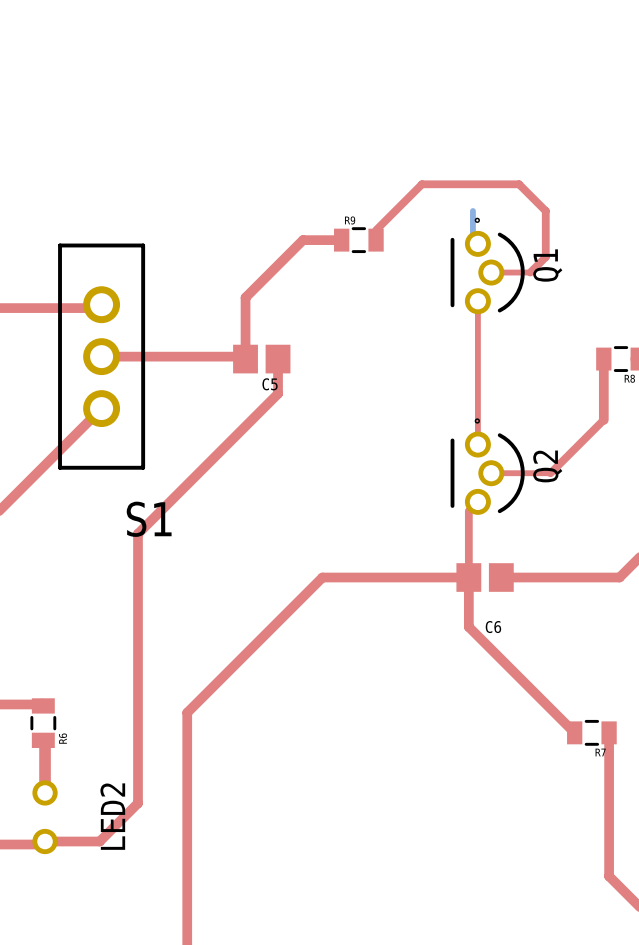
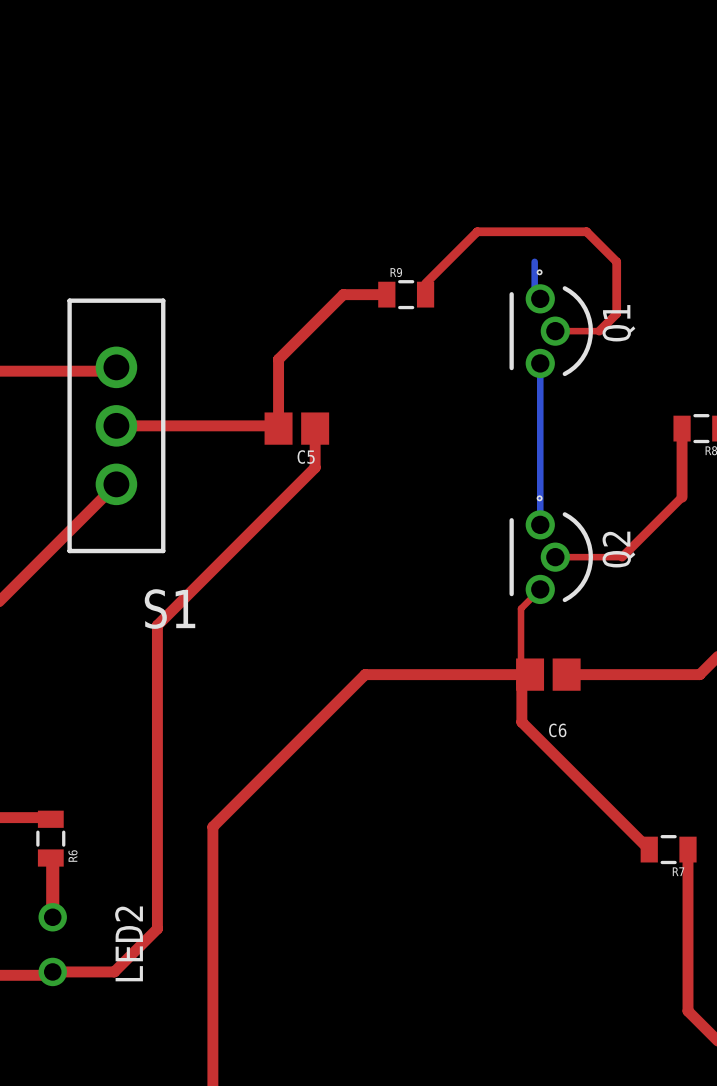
top track: (477, 301) (477, 444) -> none
bottom track: none -> (540, 363) (540, 524)
top track: (468, 510) (468, 627) -> (530, 599) (521, 608) (521, 674)
top track: none -> (530, 674) (521, 682) (521, 722) (530, 730)

